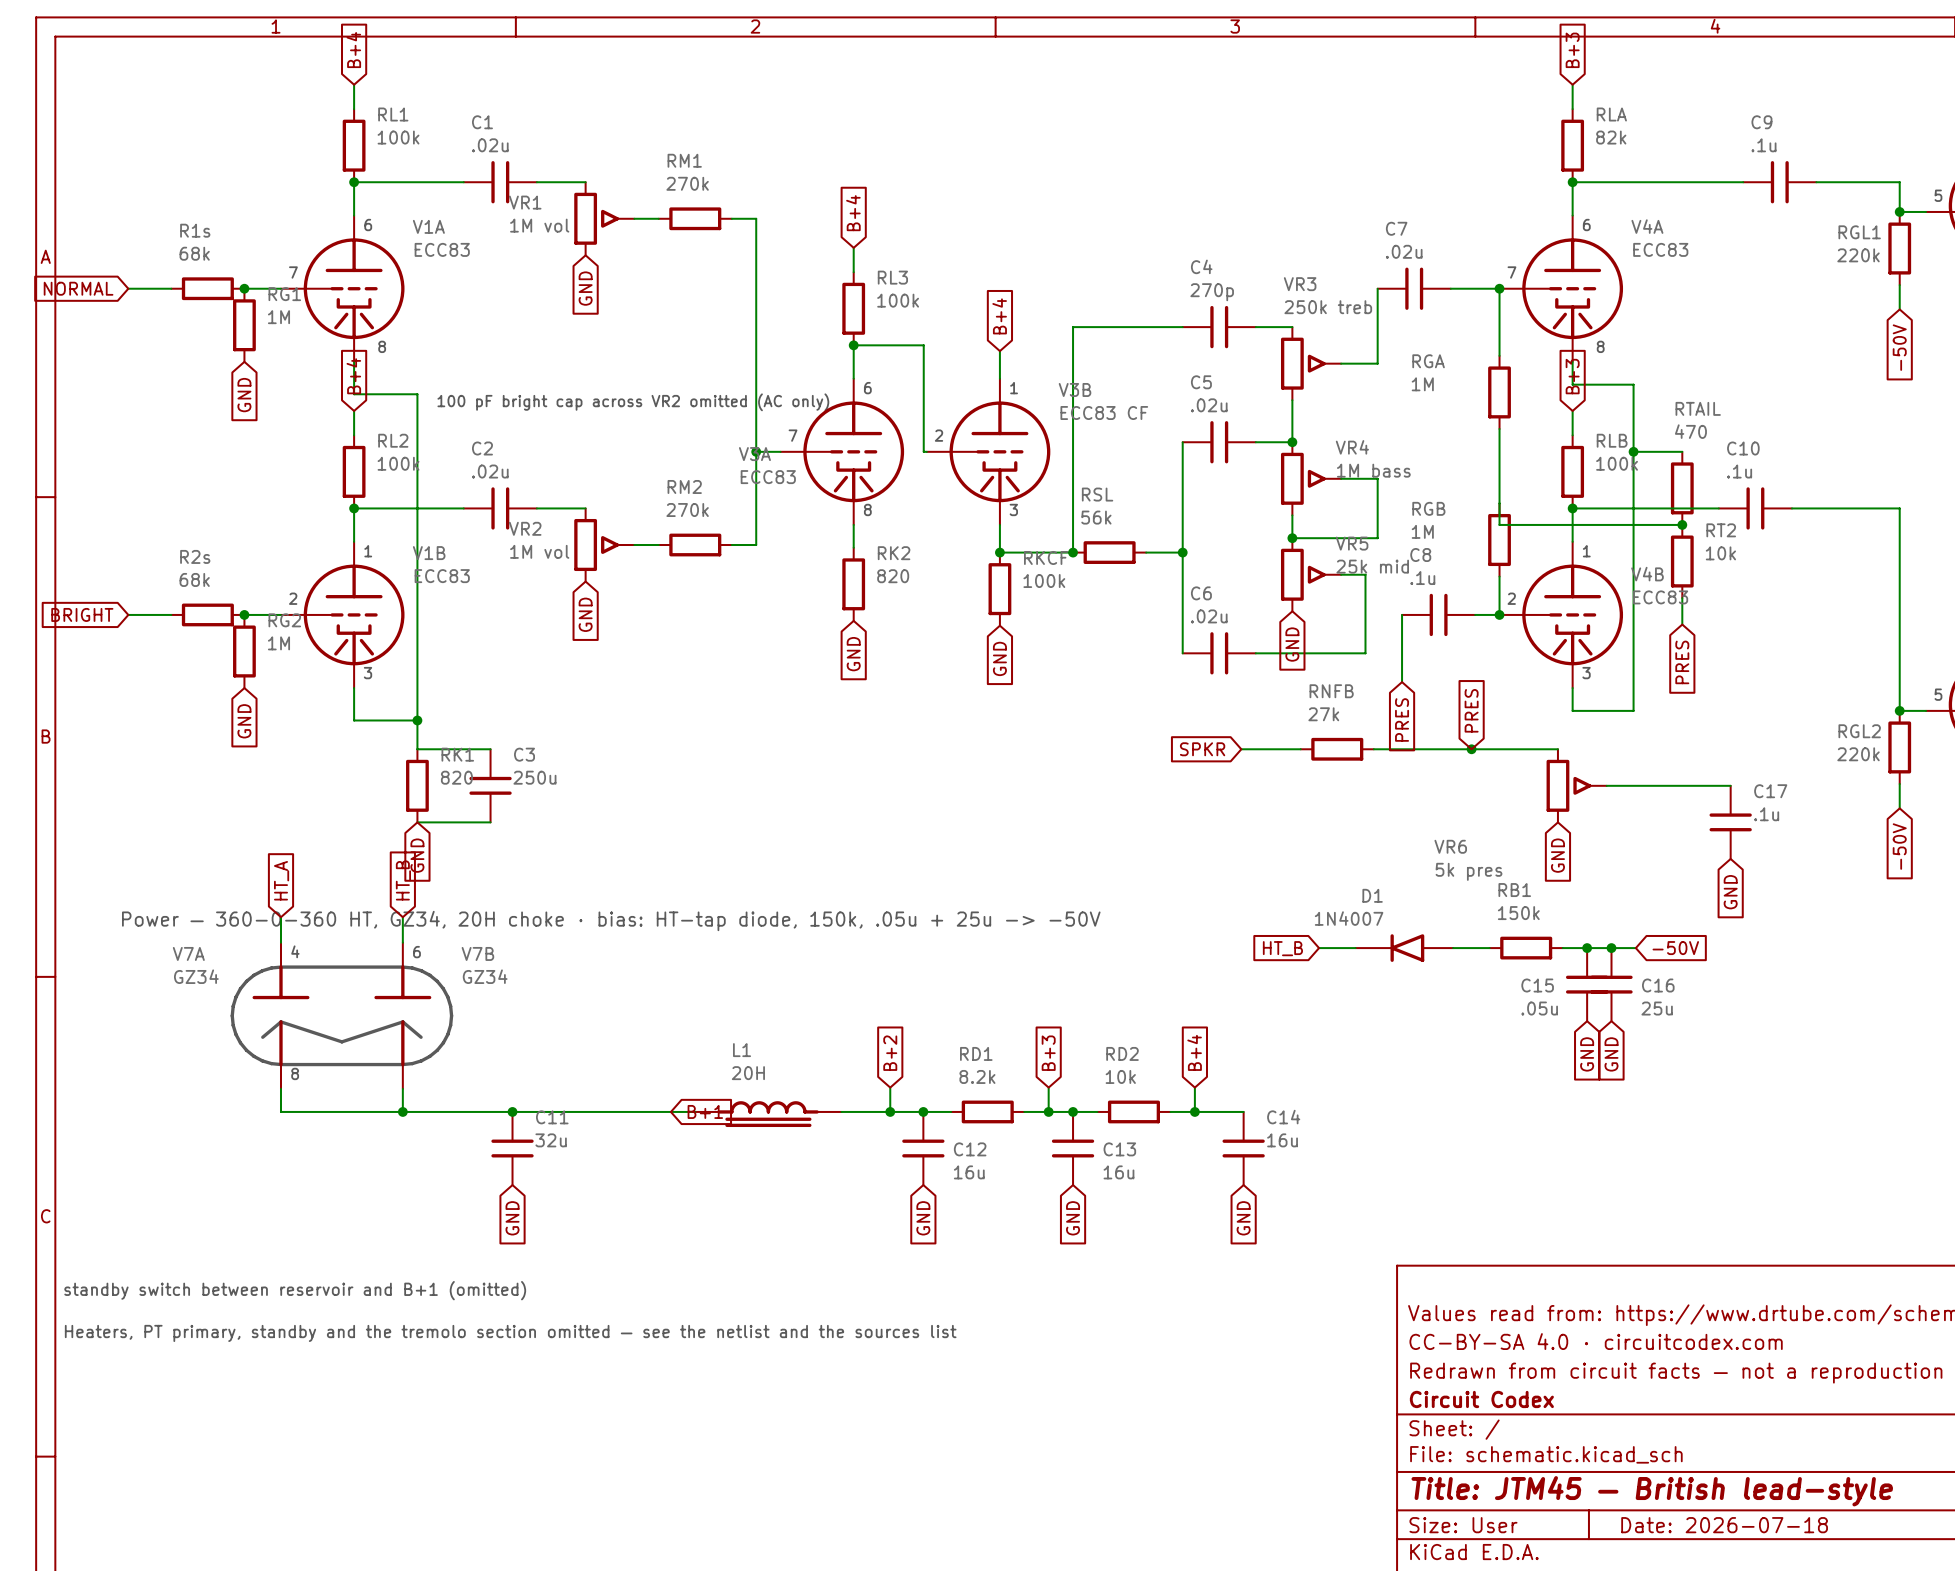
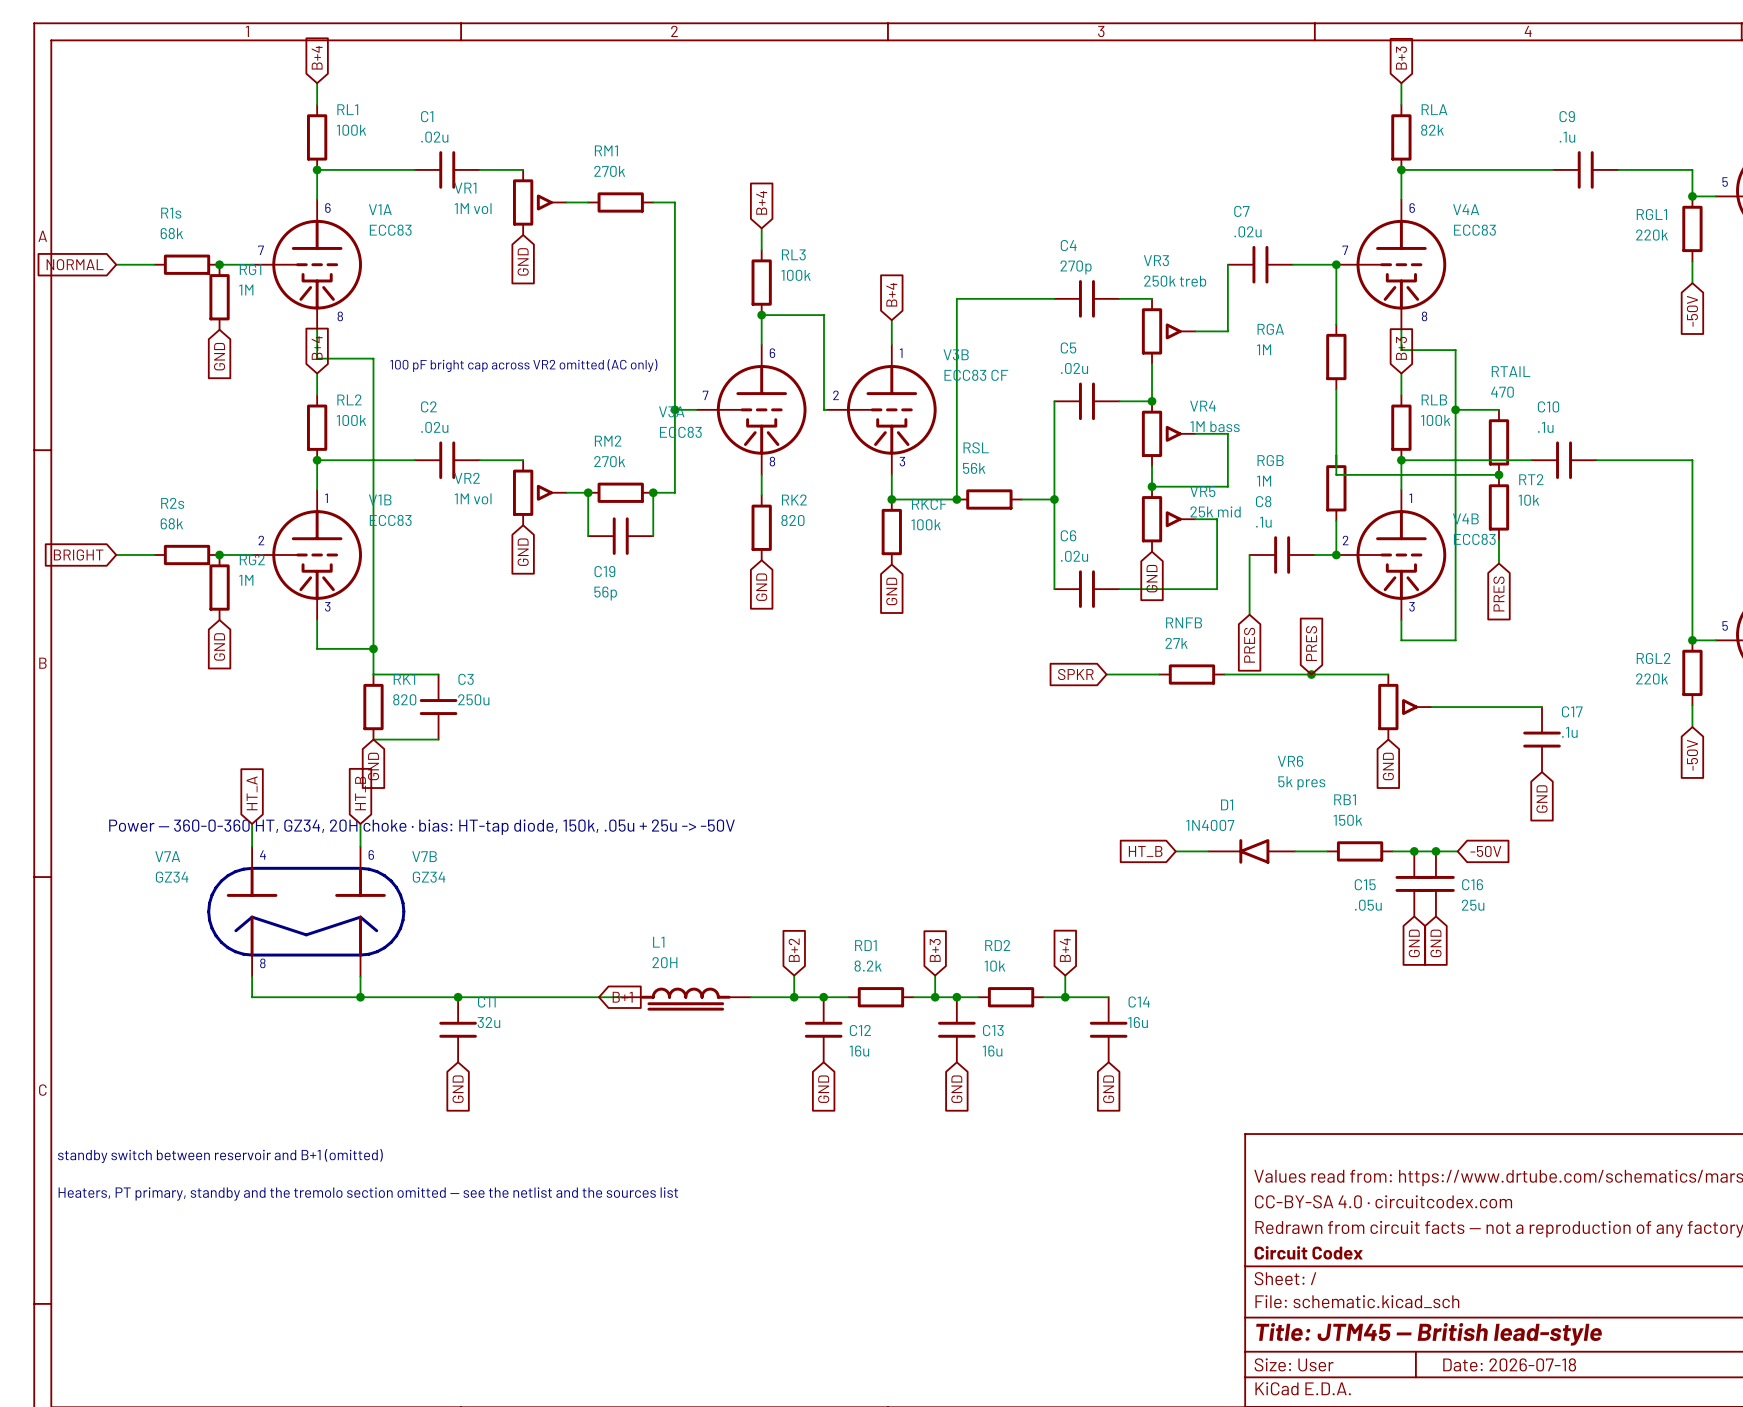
wire: none -> (588, 492) (588, 536)
junction: none -> (588, 492)
wire: none -> (653, 492) (653, 536)
junction: none -> (653, 492)
C19: none -> 56p (620, 536)

